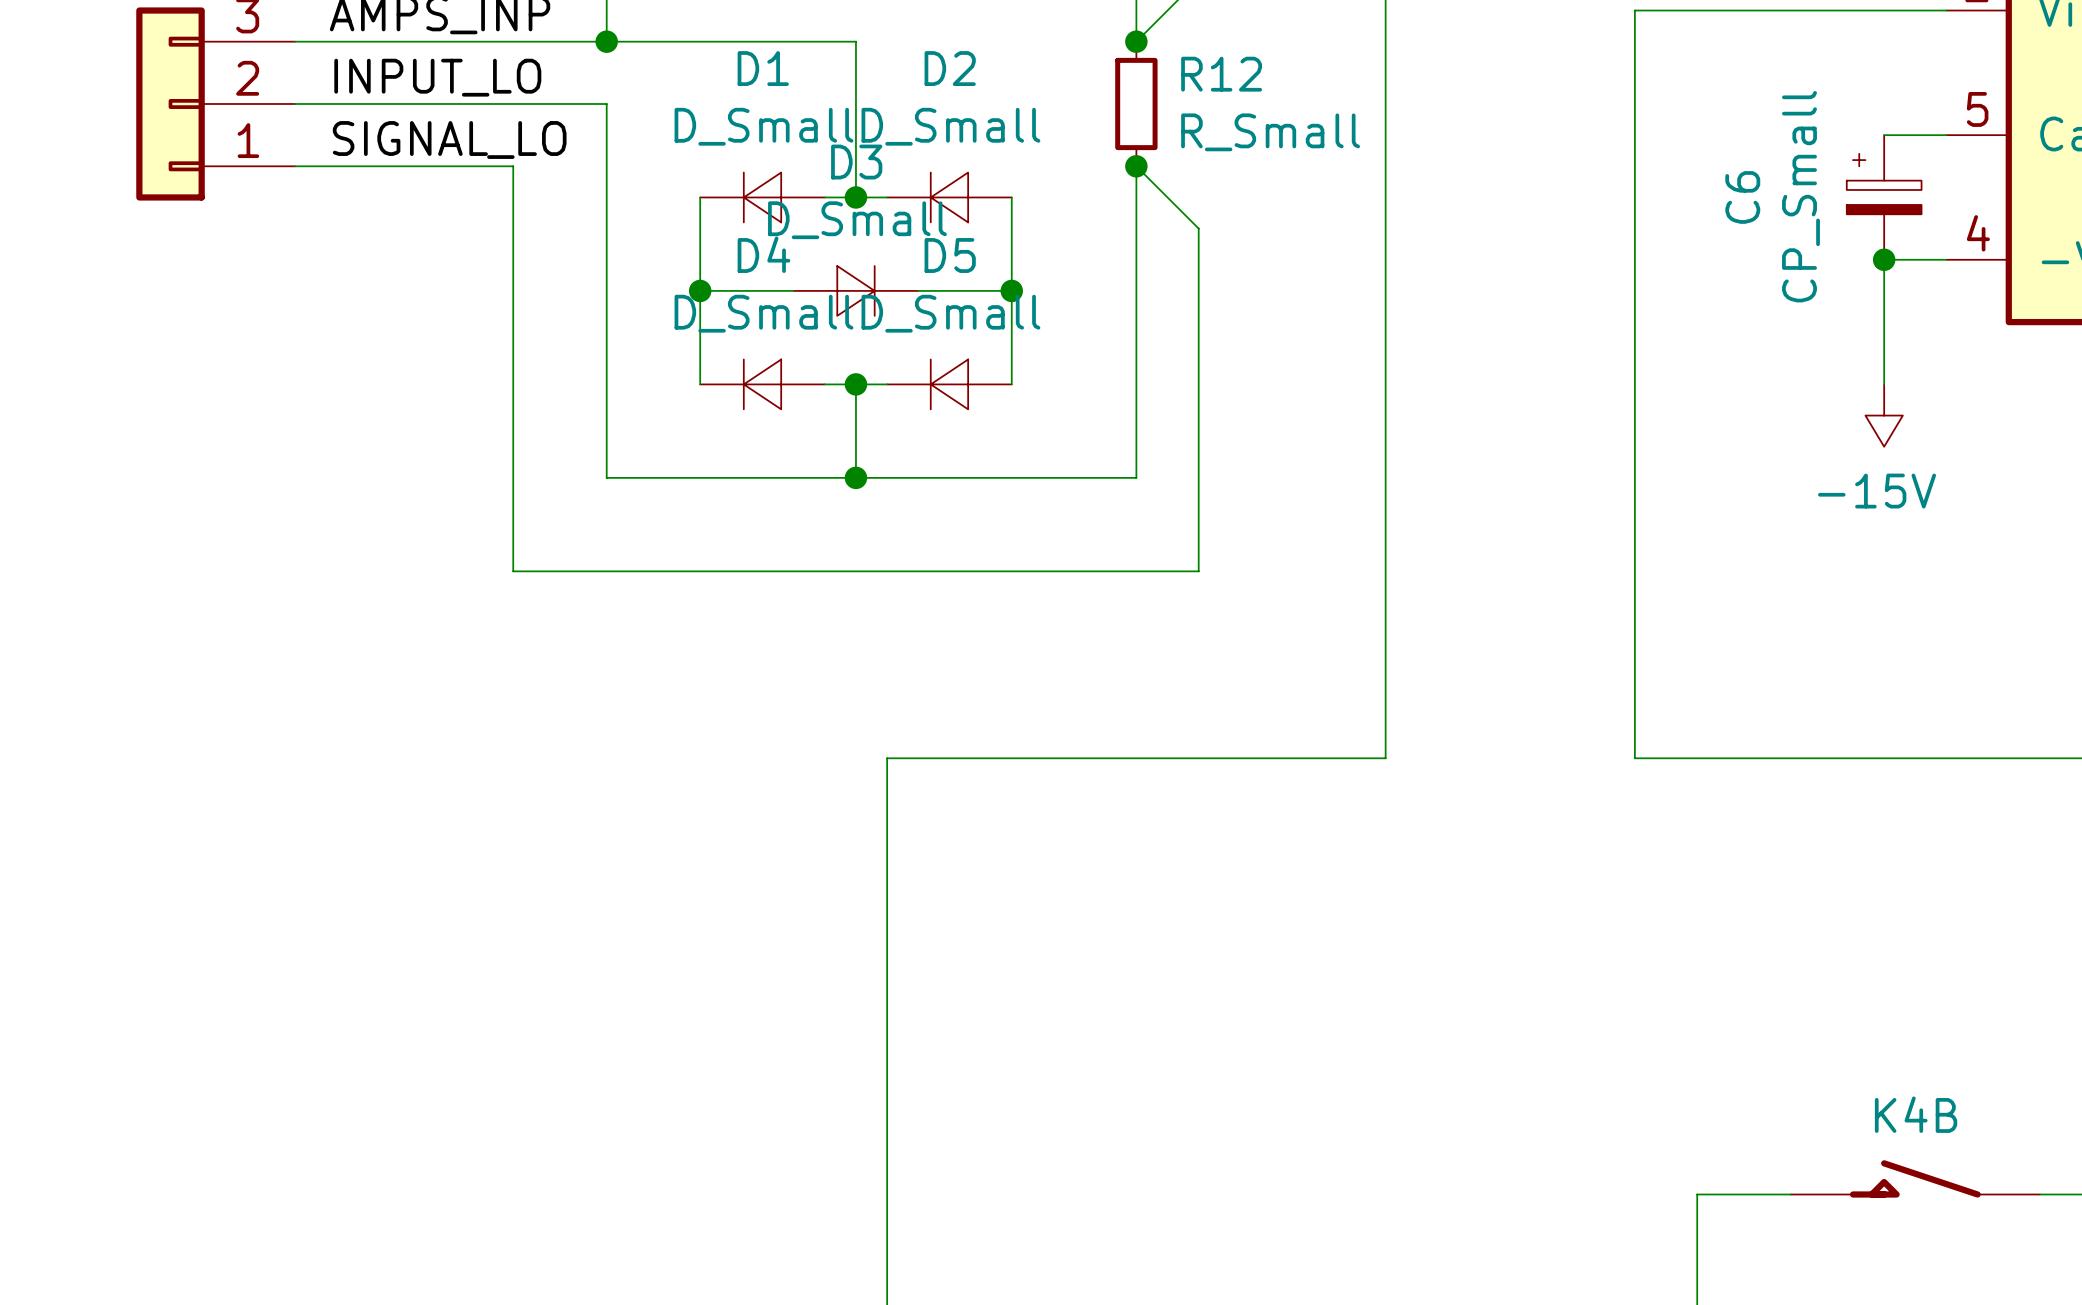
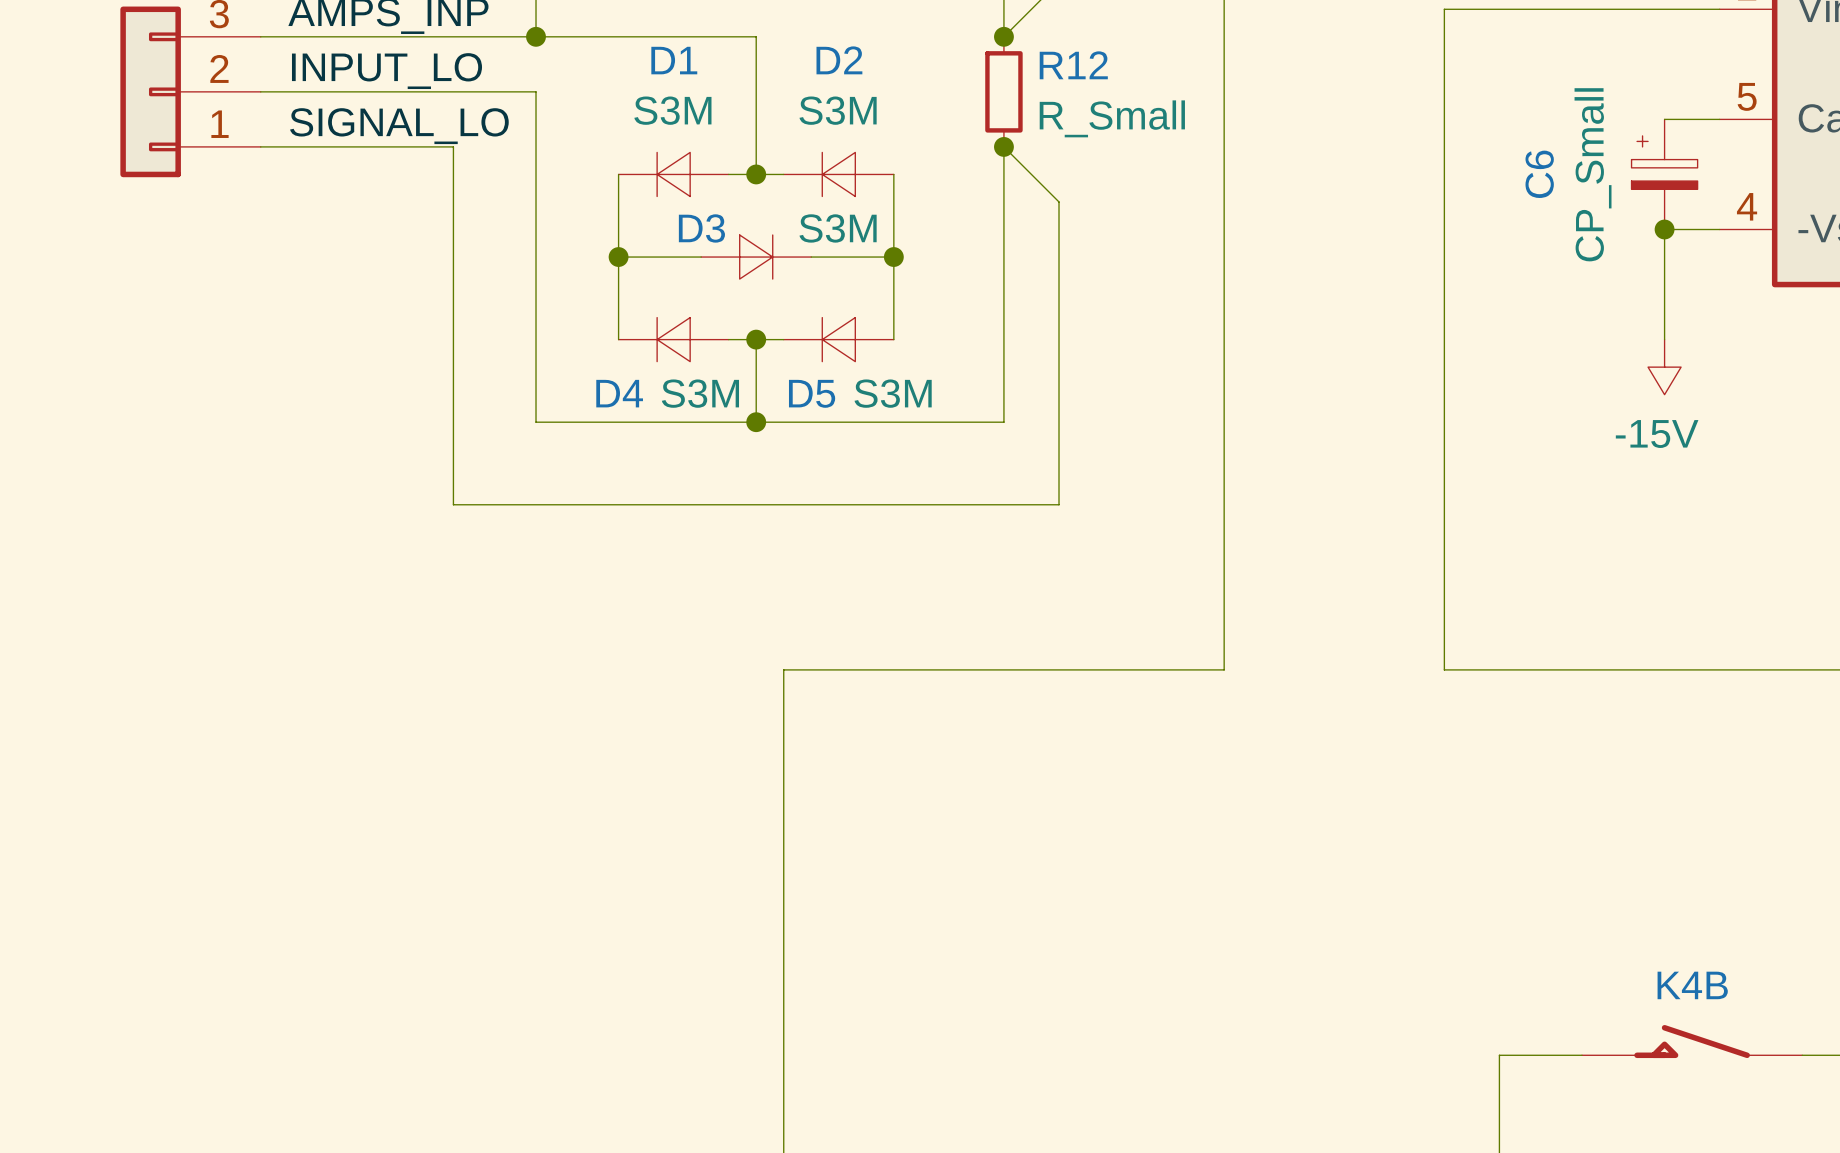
D1 value: D_Small (763, 126) -> S3M (672, 110)
D2 value: D_Small (950, 126) -> S3M (838, 110)
D3 name position: D3 (856, 162) -> D3 (701, 228)
D3 value: D_Small (857, 220) -> S3M (838, 228)
D4 name position: D4 (763, 254) -> D4 (619, 393)
D5 name position: D5 (950, 255) -> D5 (812, 393)
D4 value: D_Small (763, 313) -> S3M (700, 393)
D5 value: D_Small (950, 313) -> S3M (893, 393)

